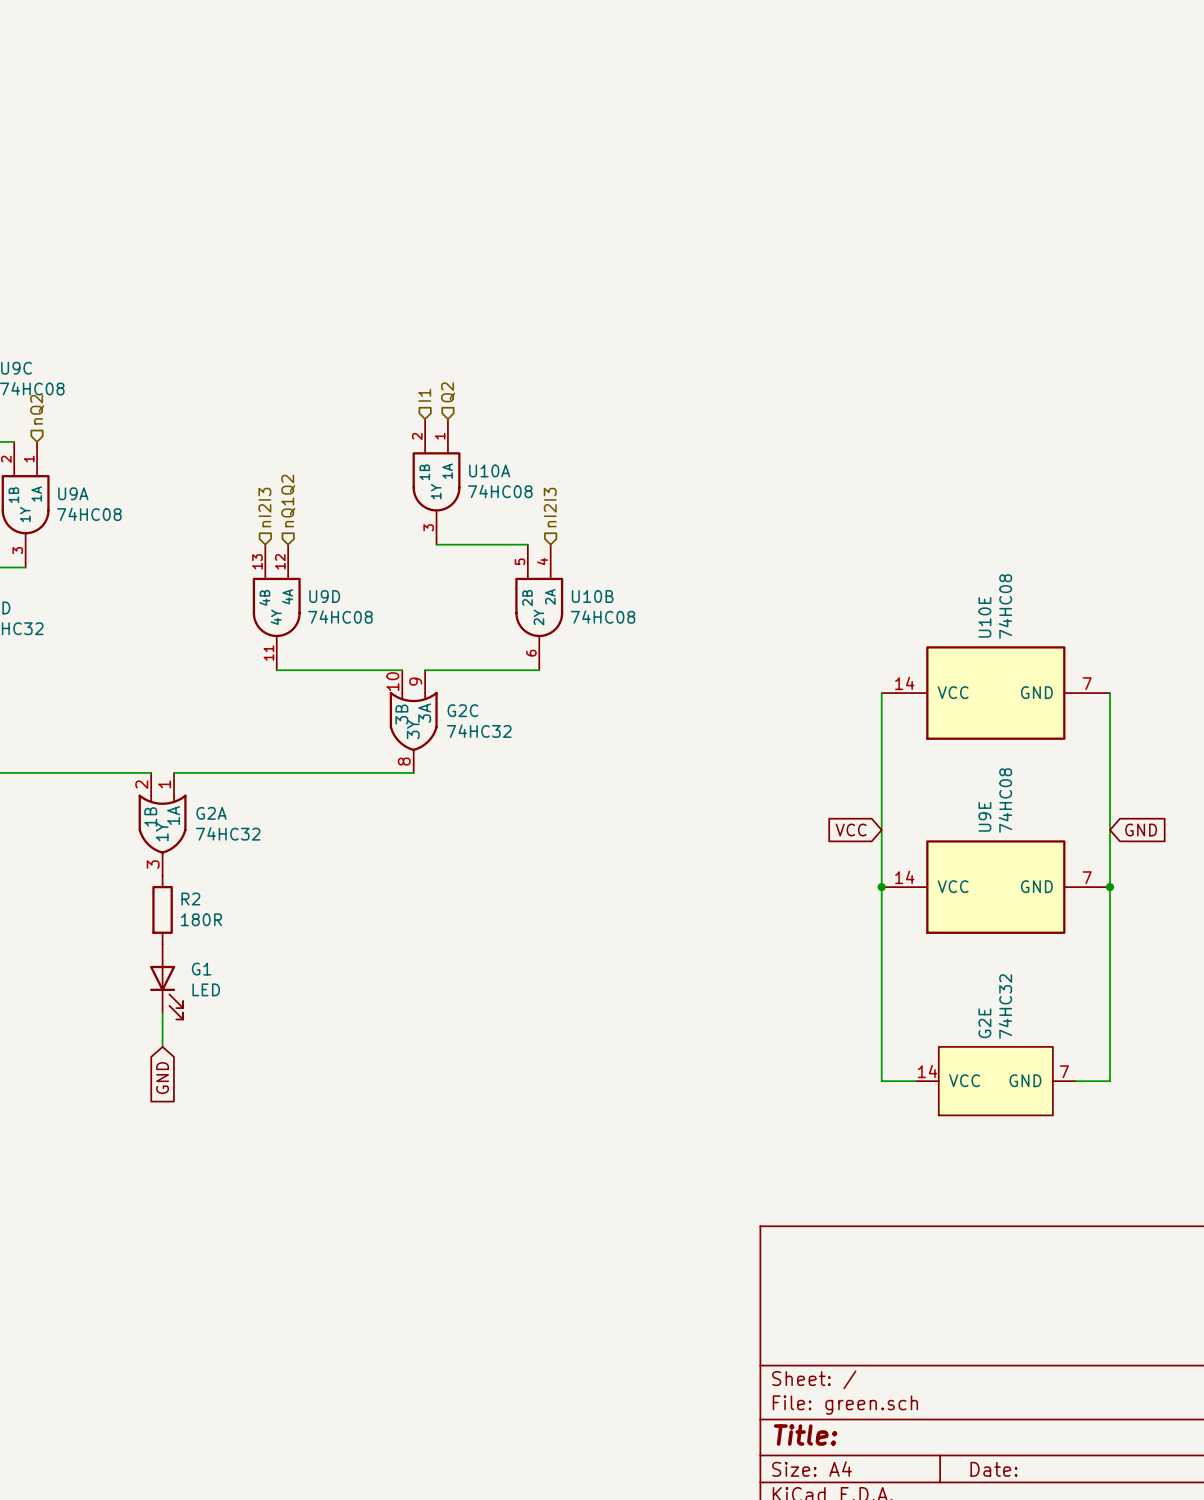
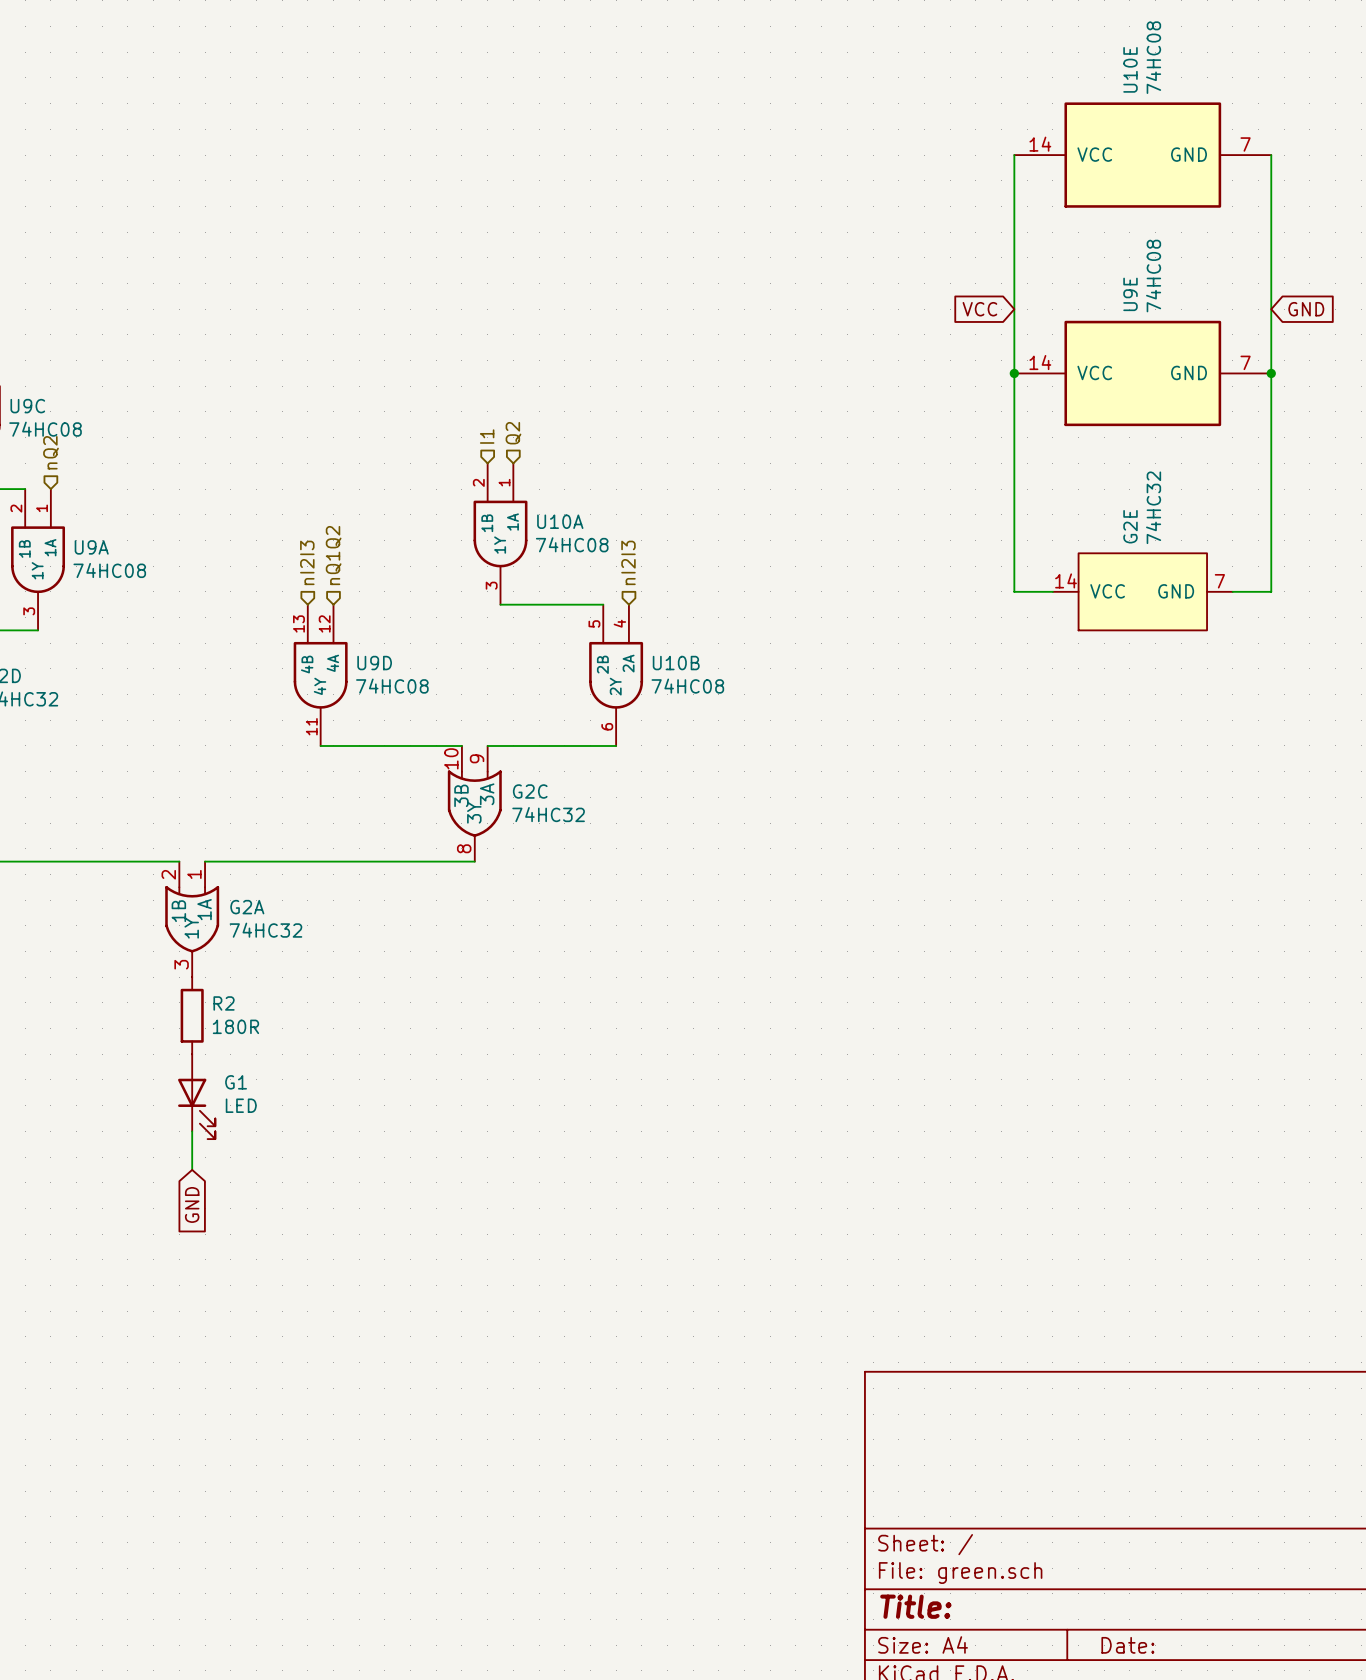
wire: none -> (1014, 155) (1014, 591) (1052, 591)
wire: none -> (1271, 155) (1271, 591) (1232, 591)
global label: none -> VCC (979, 309)
global label: none -> GND (1306, 309)
junction: none -> (1014, 373)
junction: none -> (1271, 373)
wire: (881, 693) (881, 1081) (915, 1081) -> none
U10E position: (995, 693) -> (1142, 155)
wire: (1109, 693) (1109, 1081) (1075, 1081) -> none
global label: VCC (851, 830) -> none
global label: GND (1141, 830) -> none
junction: (881, 887) -> none
U9E position: (995, 887) -> (1142, 373)
junction: (1109, 887) -> none
G2E position: (995, 1081) -> (1142, 591)

